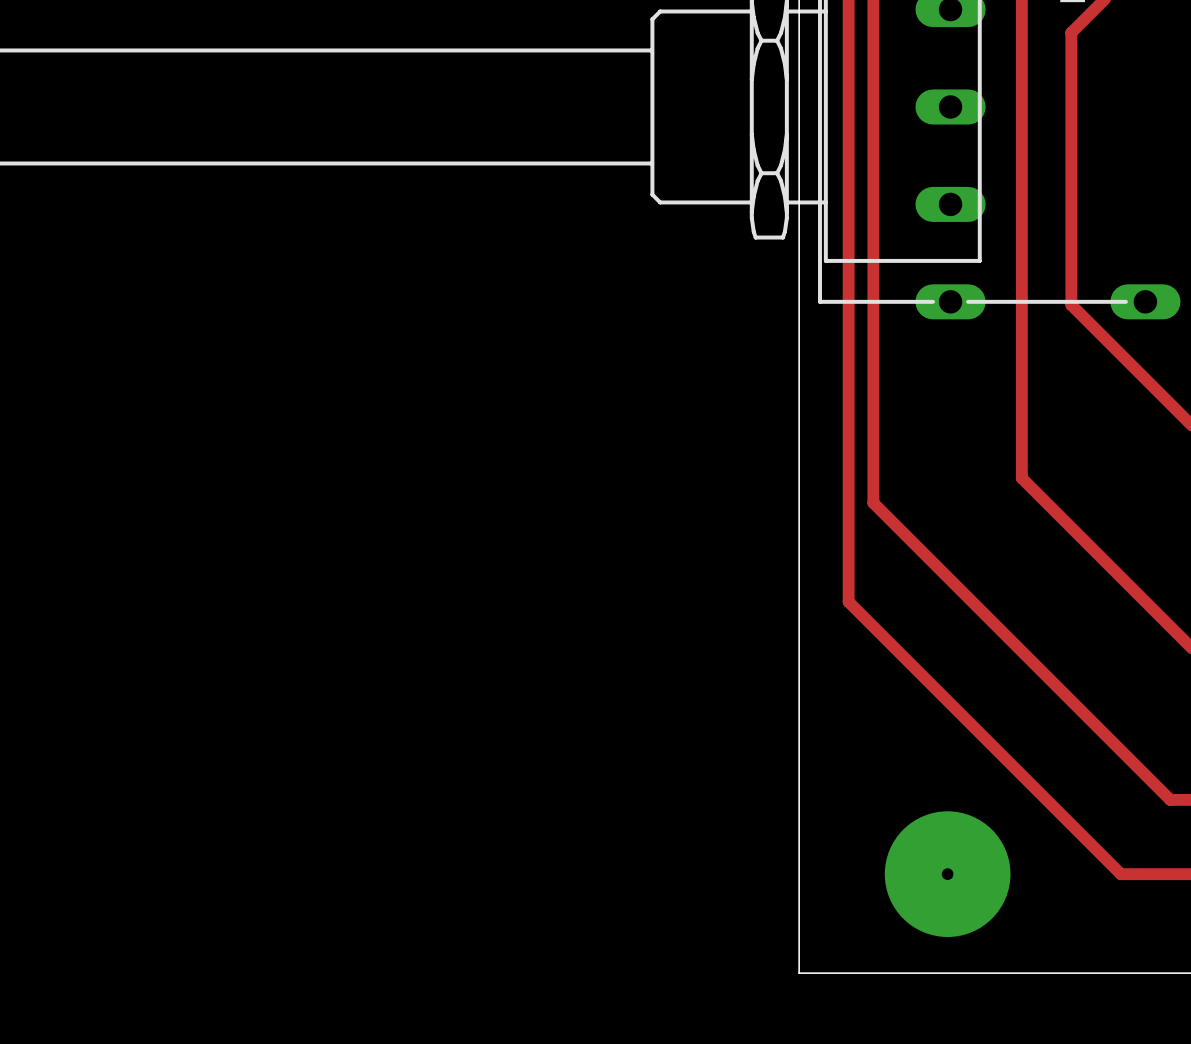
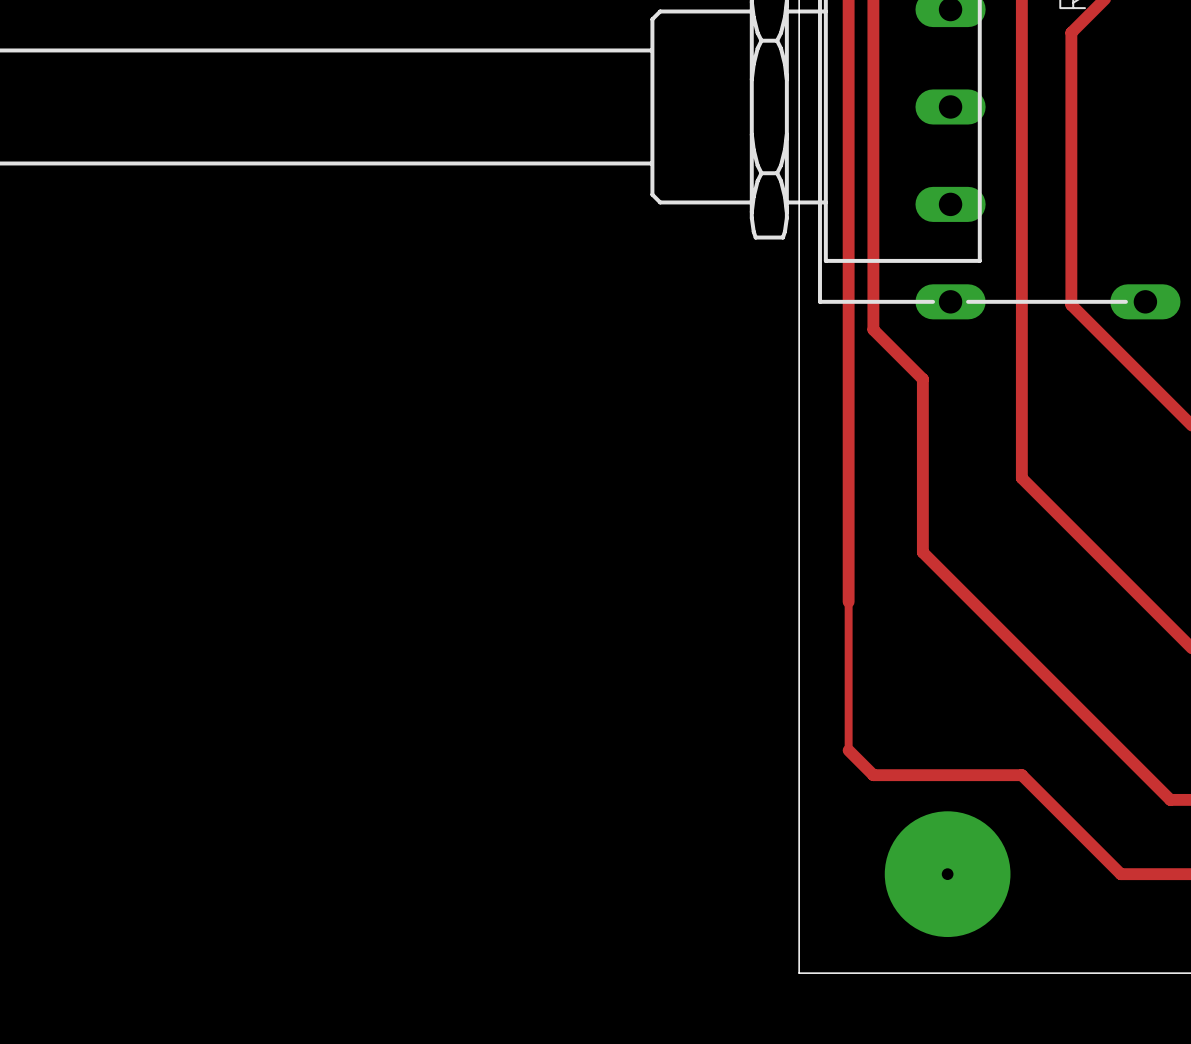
track: (873, 329) (873, 502) (922, 552) -> (873, 329) (922, 379) (922, 552)
track: (848, 601) (1021, 775) -> (848, 601) (848, 750) (873, 775) (1021, 775)

